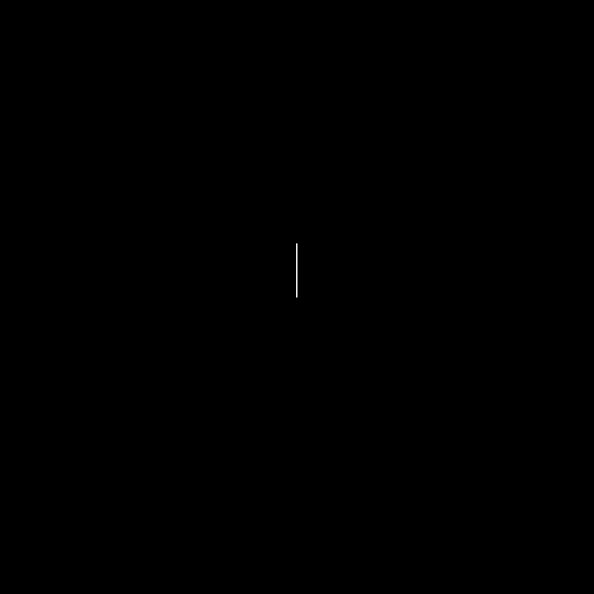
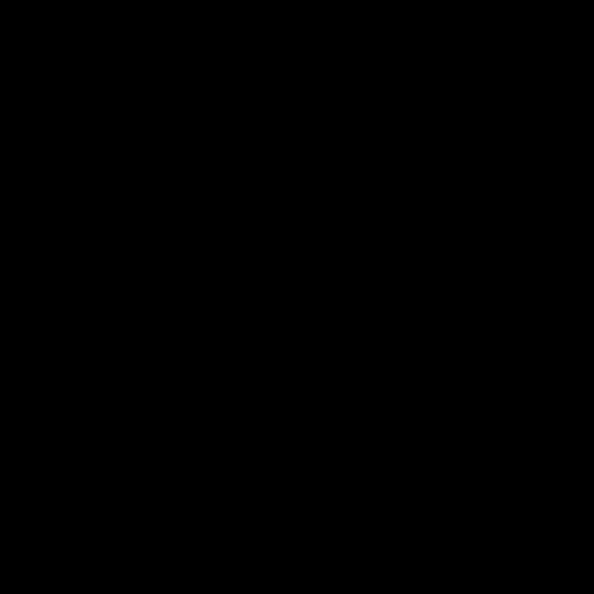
board edge: (296, 243) (296, 297) -> none

